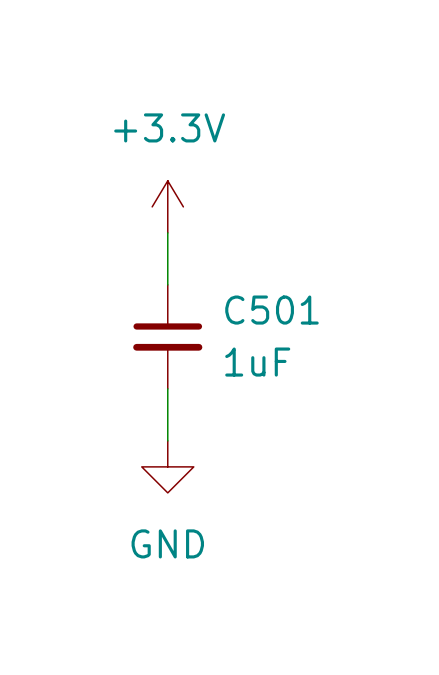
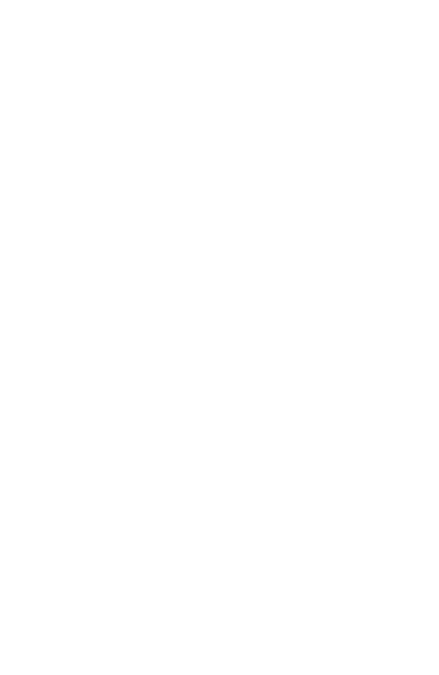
power symbol: +3.3V (167, 206) -> none
wire: (167, 232) (167, 284) -> none
C501: 1uF (167, 336) -> none
wire: (167, 388) (167, 440) -> none
power symbol: GND (167, 466) -> none

